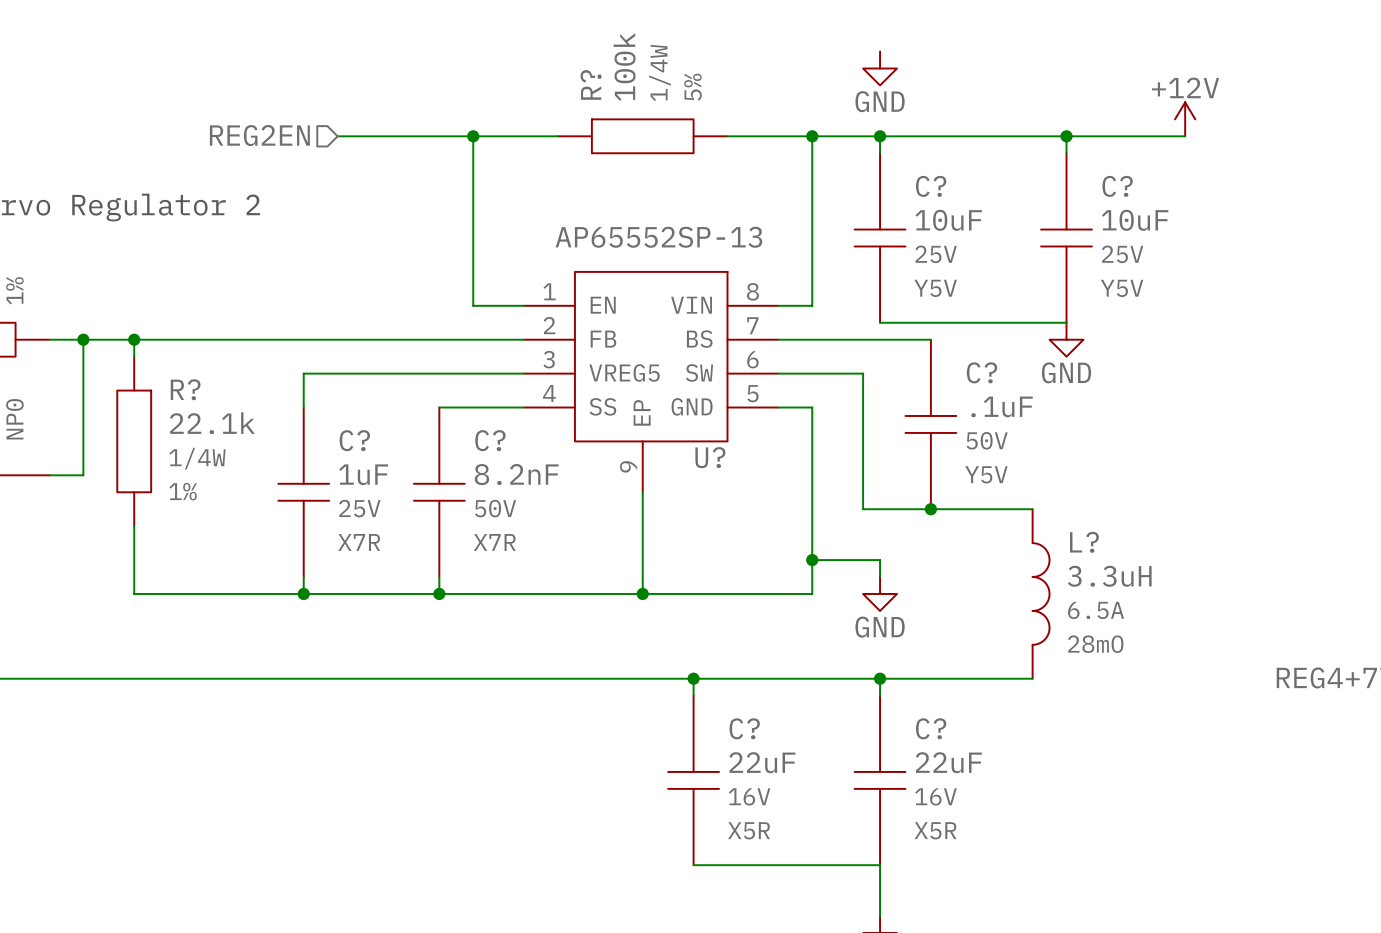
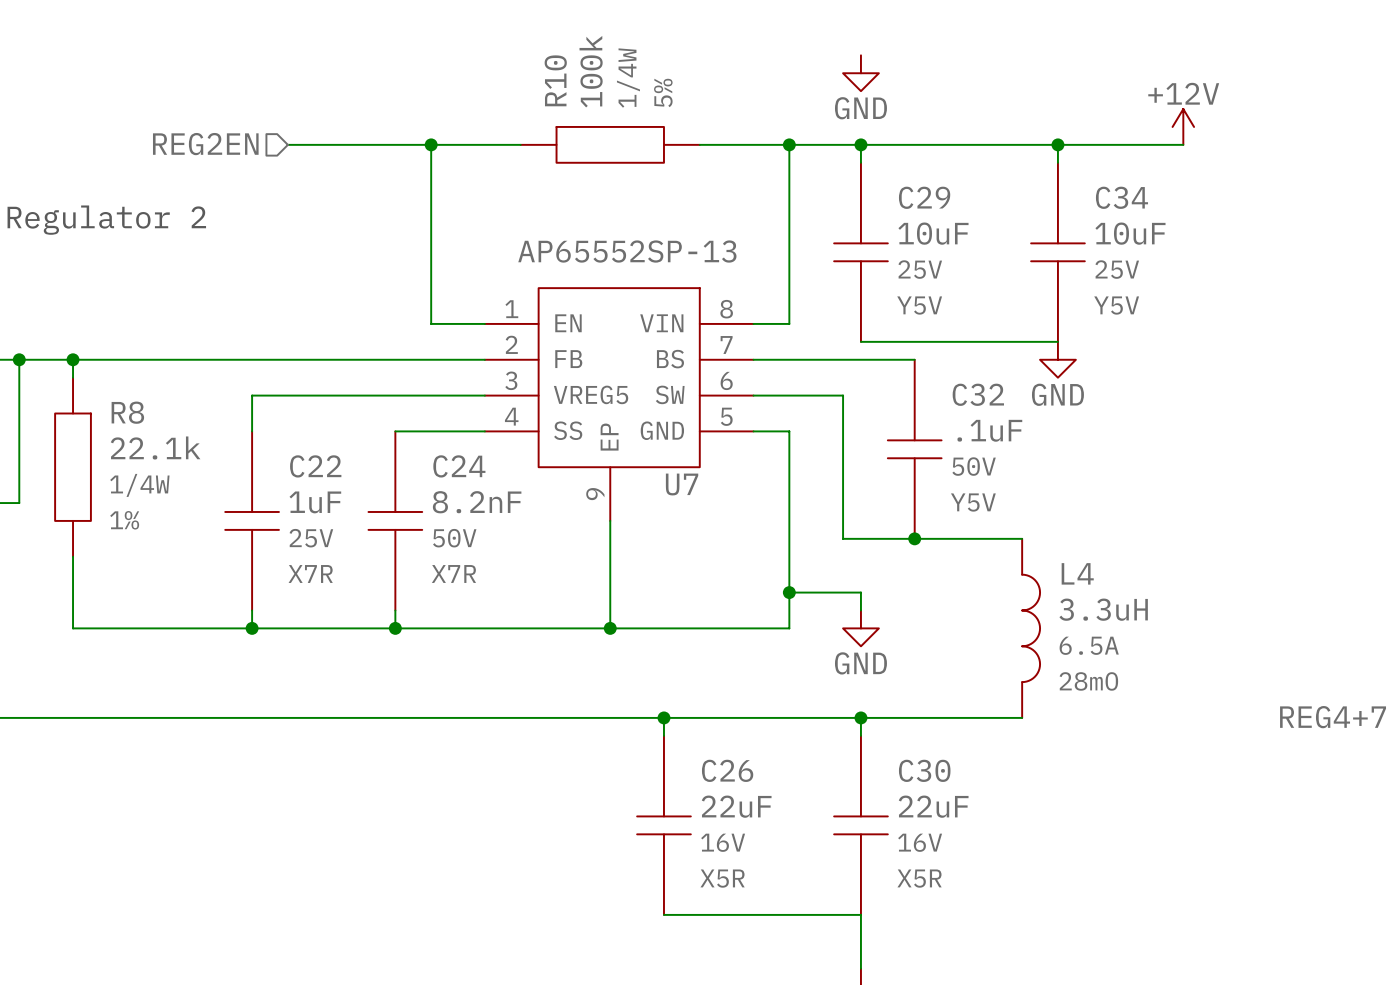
R? name: R? (591, 84) -> R10 (555, 80)
C? name: C? (931, 186) -> C29 (924, 197)
C? name: C? (1117, 186) -> C34 (1121, 197)
C? name: C? (982, 372) -> C32 (978, 394)
R? name: R? (185, 389) -> R8 (127, 412)
C? name: C? (354, 440) -> C22 (315, 466)
C? name: C? (490, 440) -> C24 (459, 466)
U? name: U? (710, 457) -> U7 (682, 484)
L? name: L? (1084, 542) -> L4 (1077, 573)
C? name: C? (744, 728) -> C26 (727, 770)
C? name: C? (931, 728) -> C30 (924, 770)

